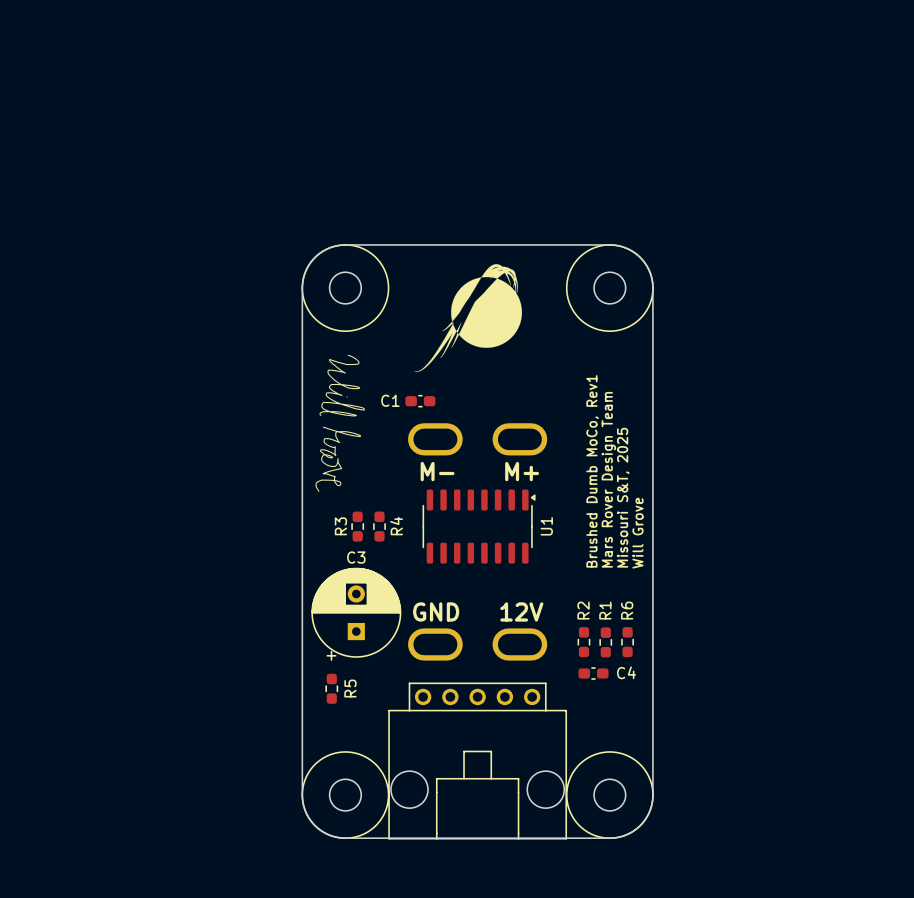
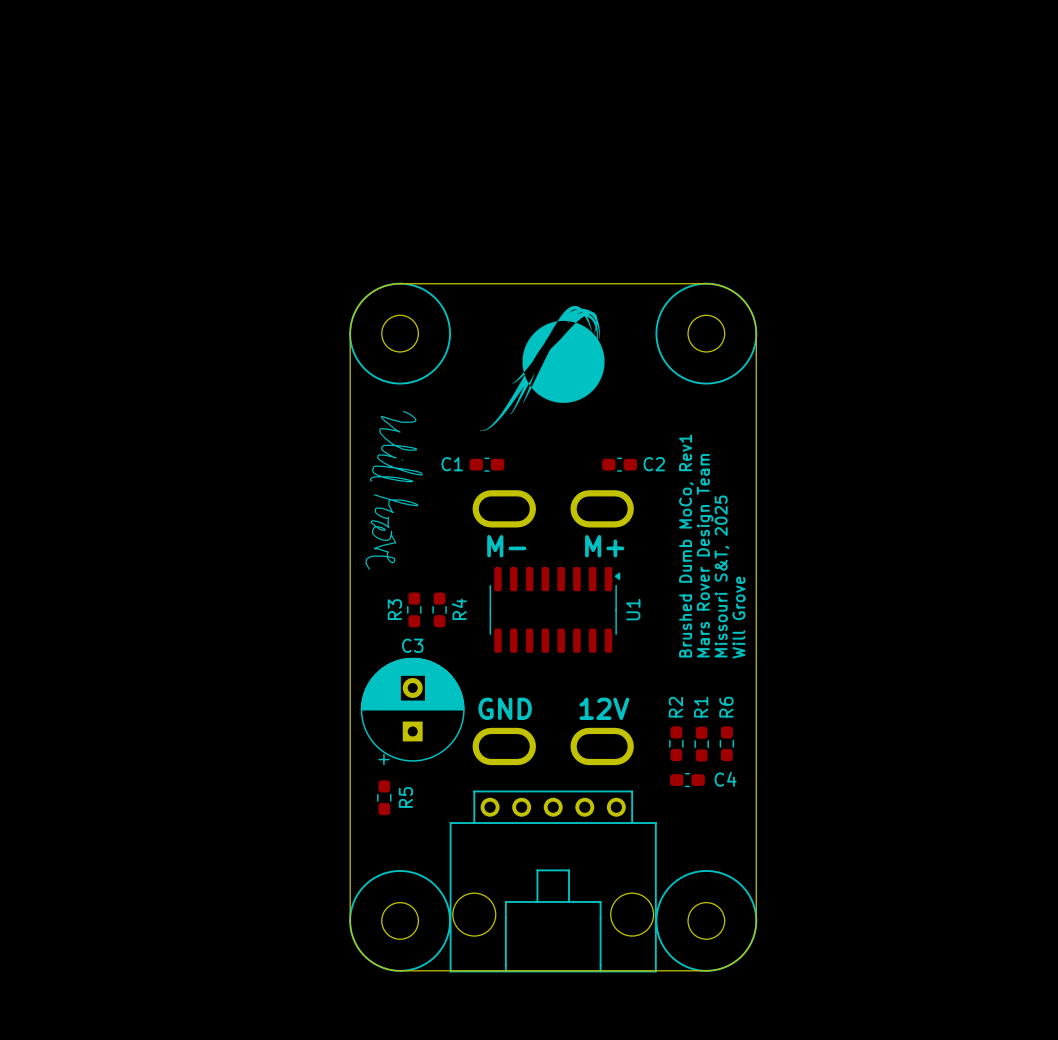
C2: none -> (619, 464)

